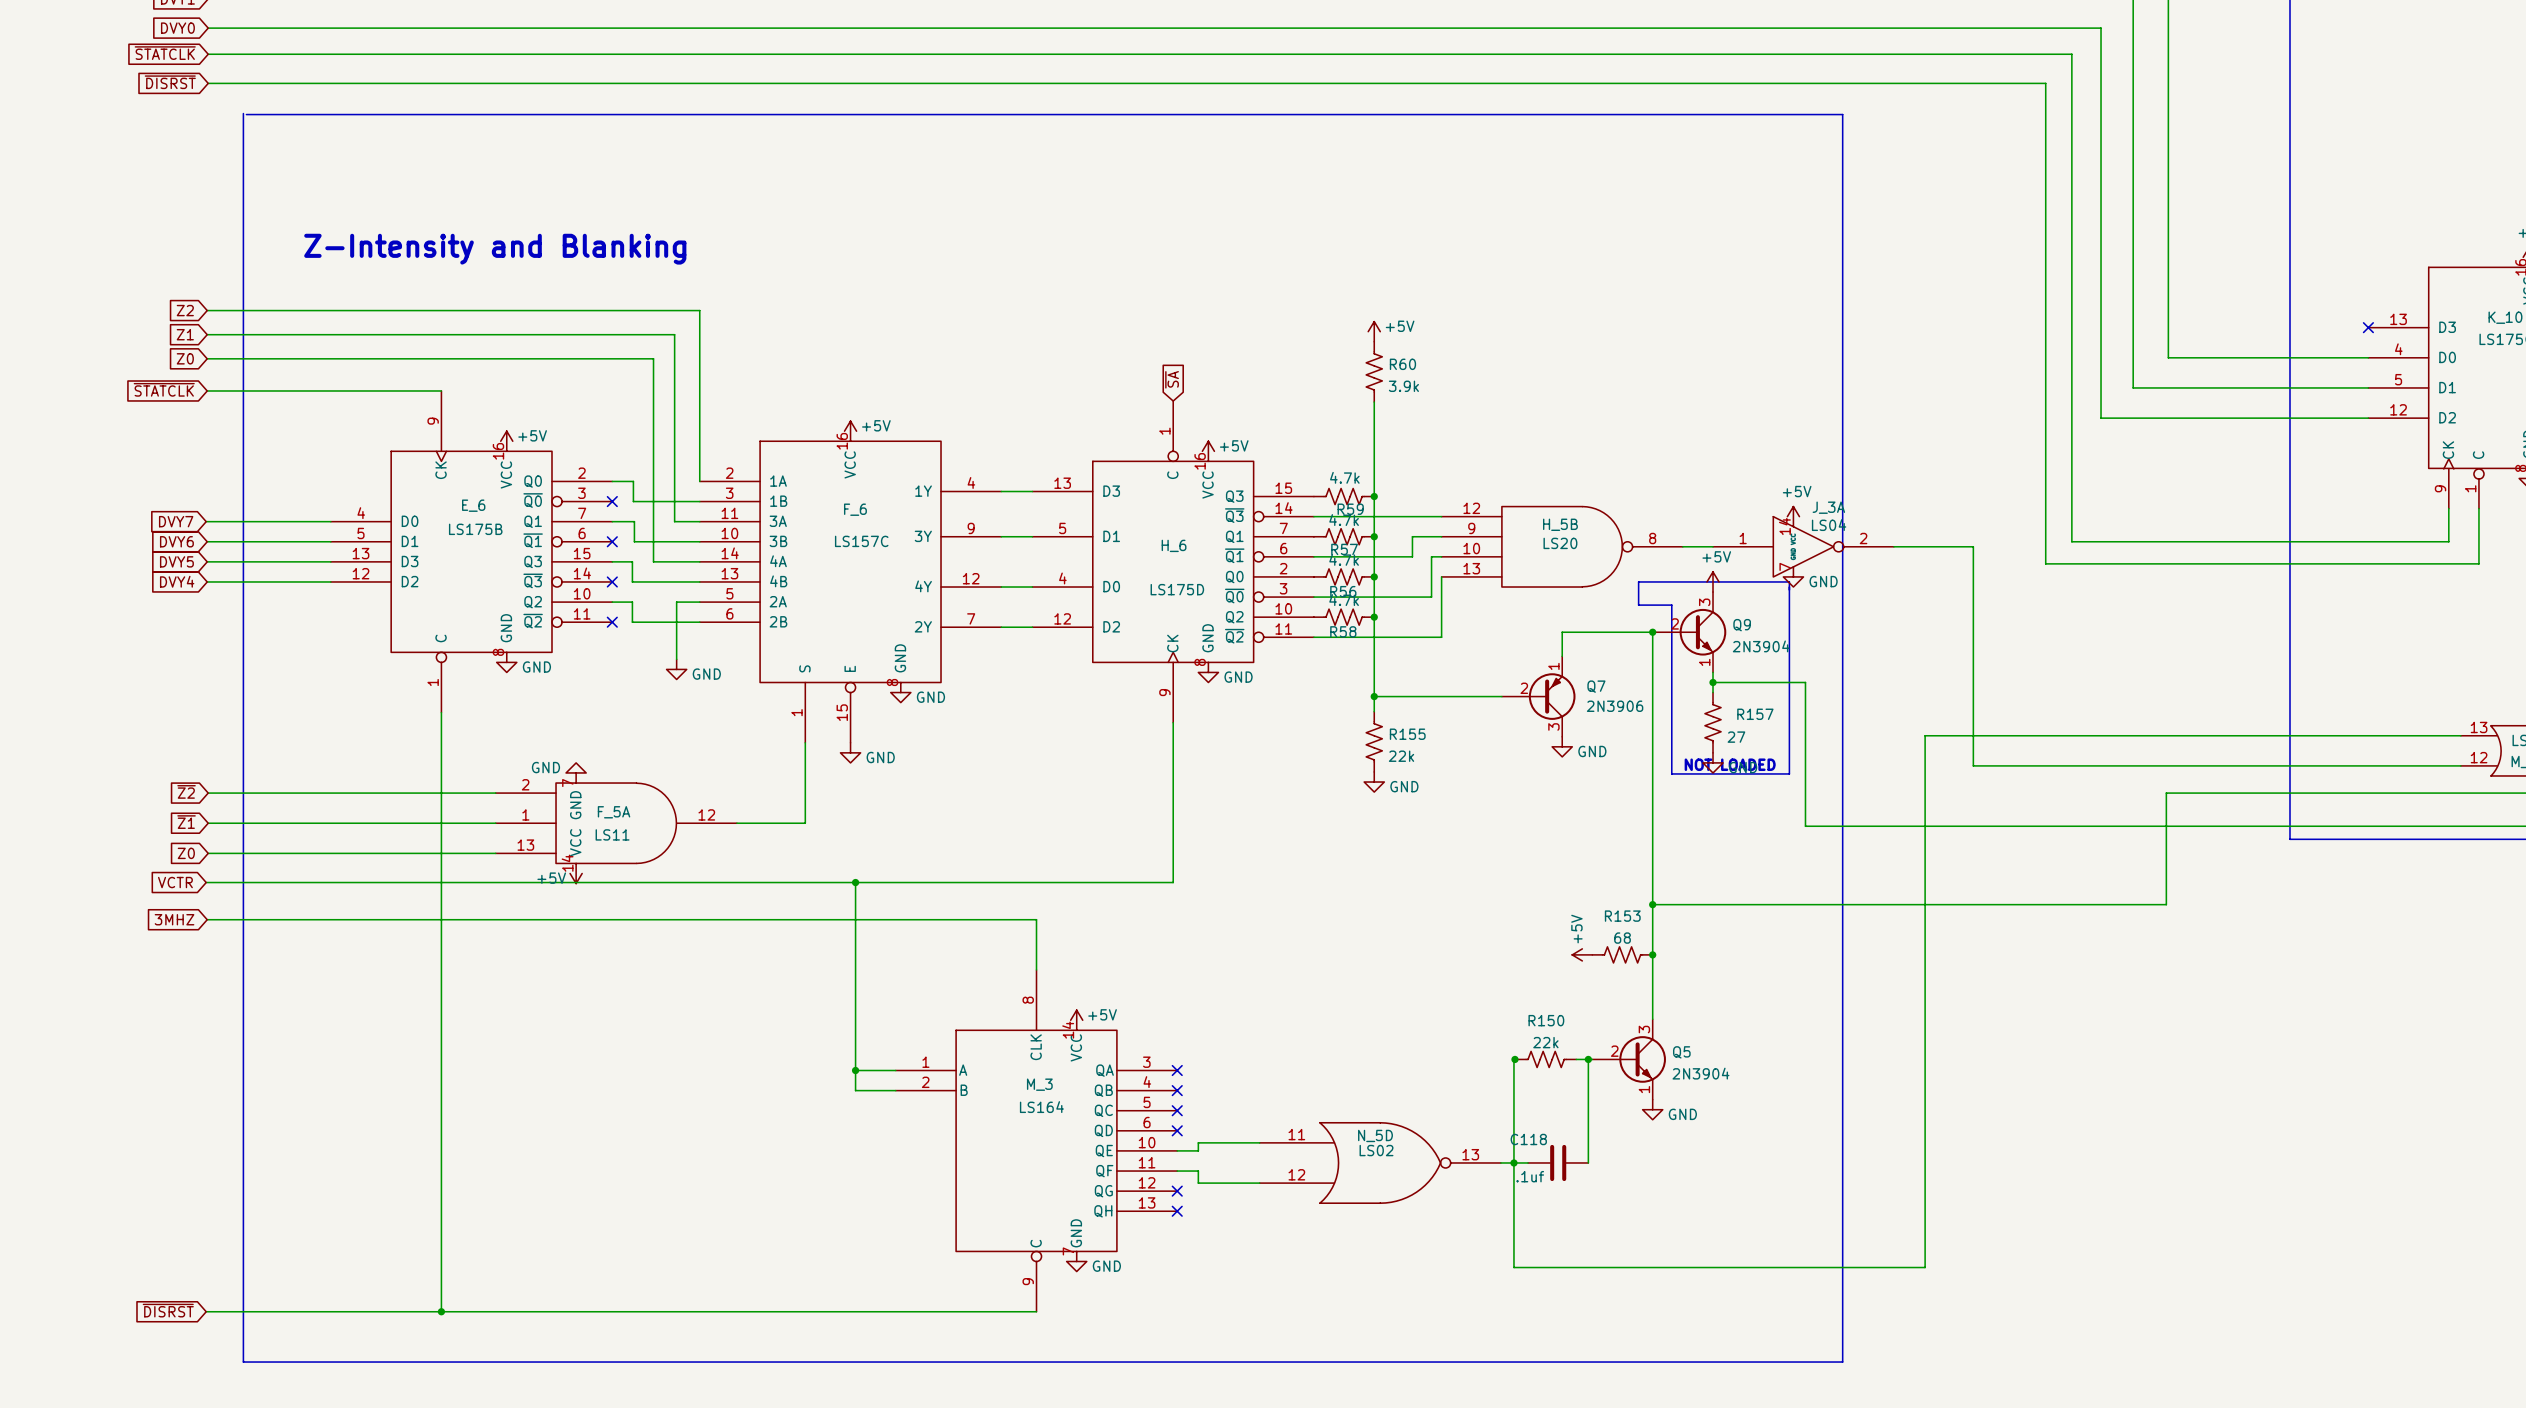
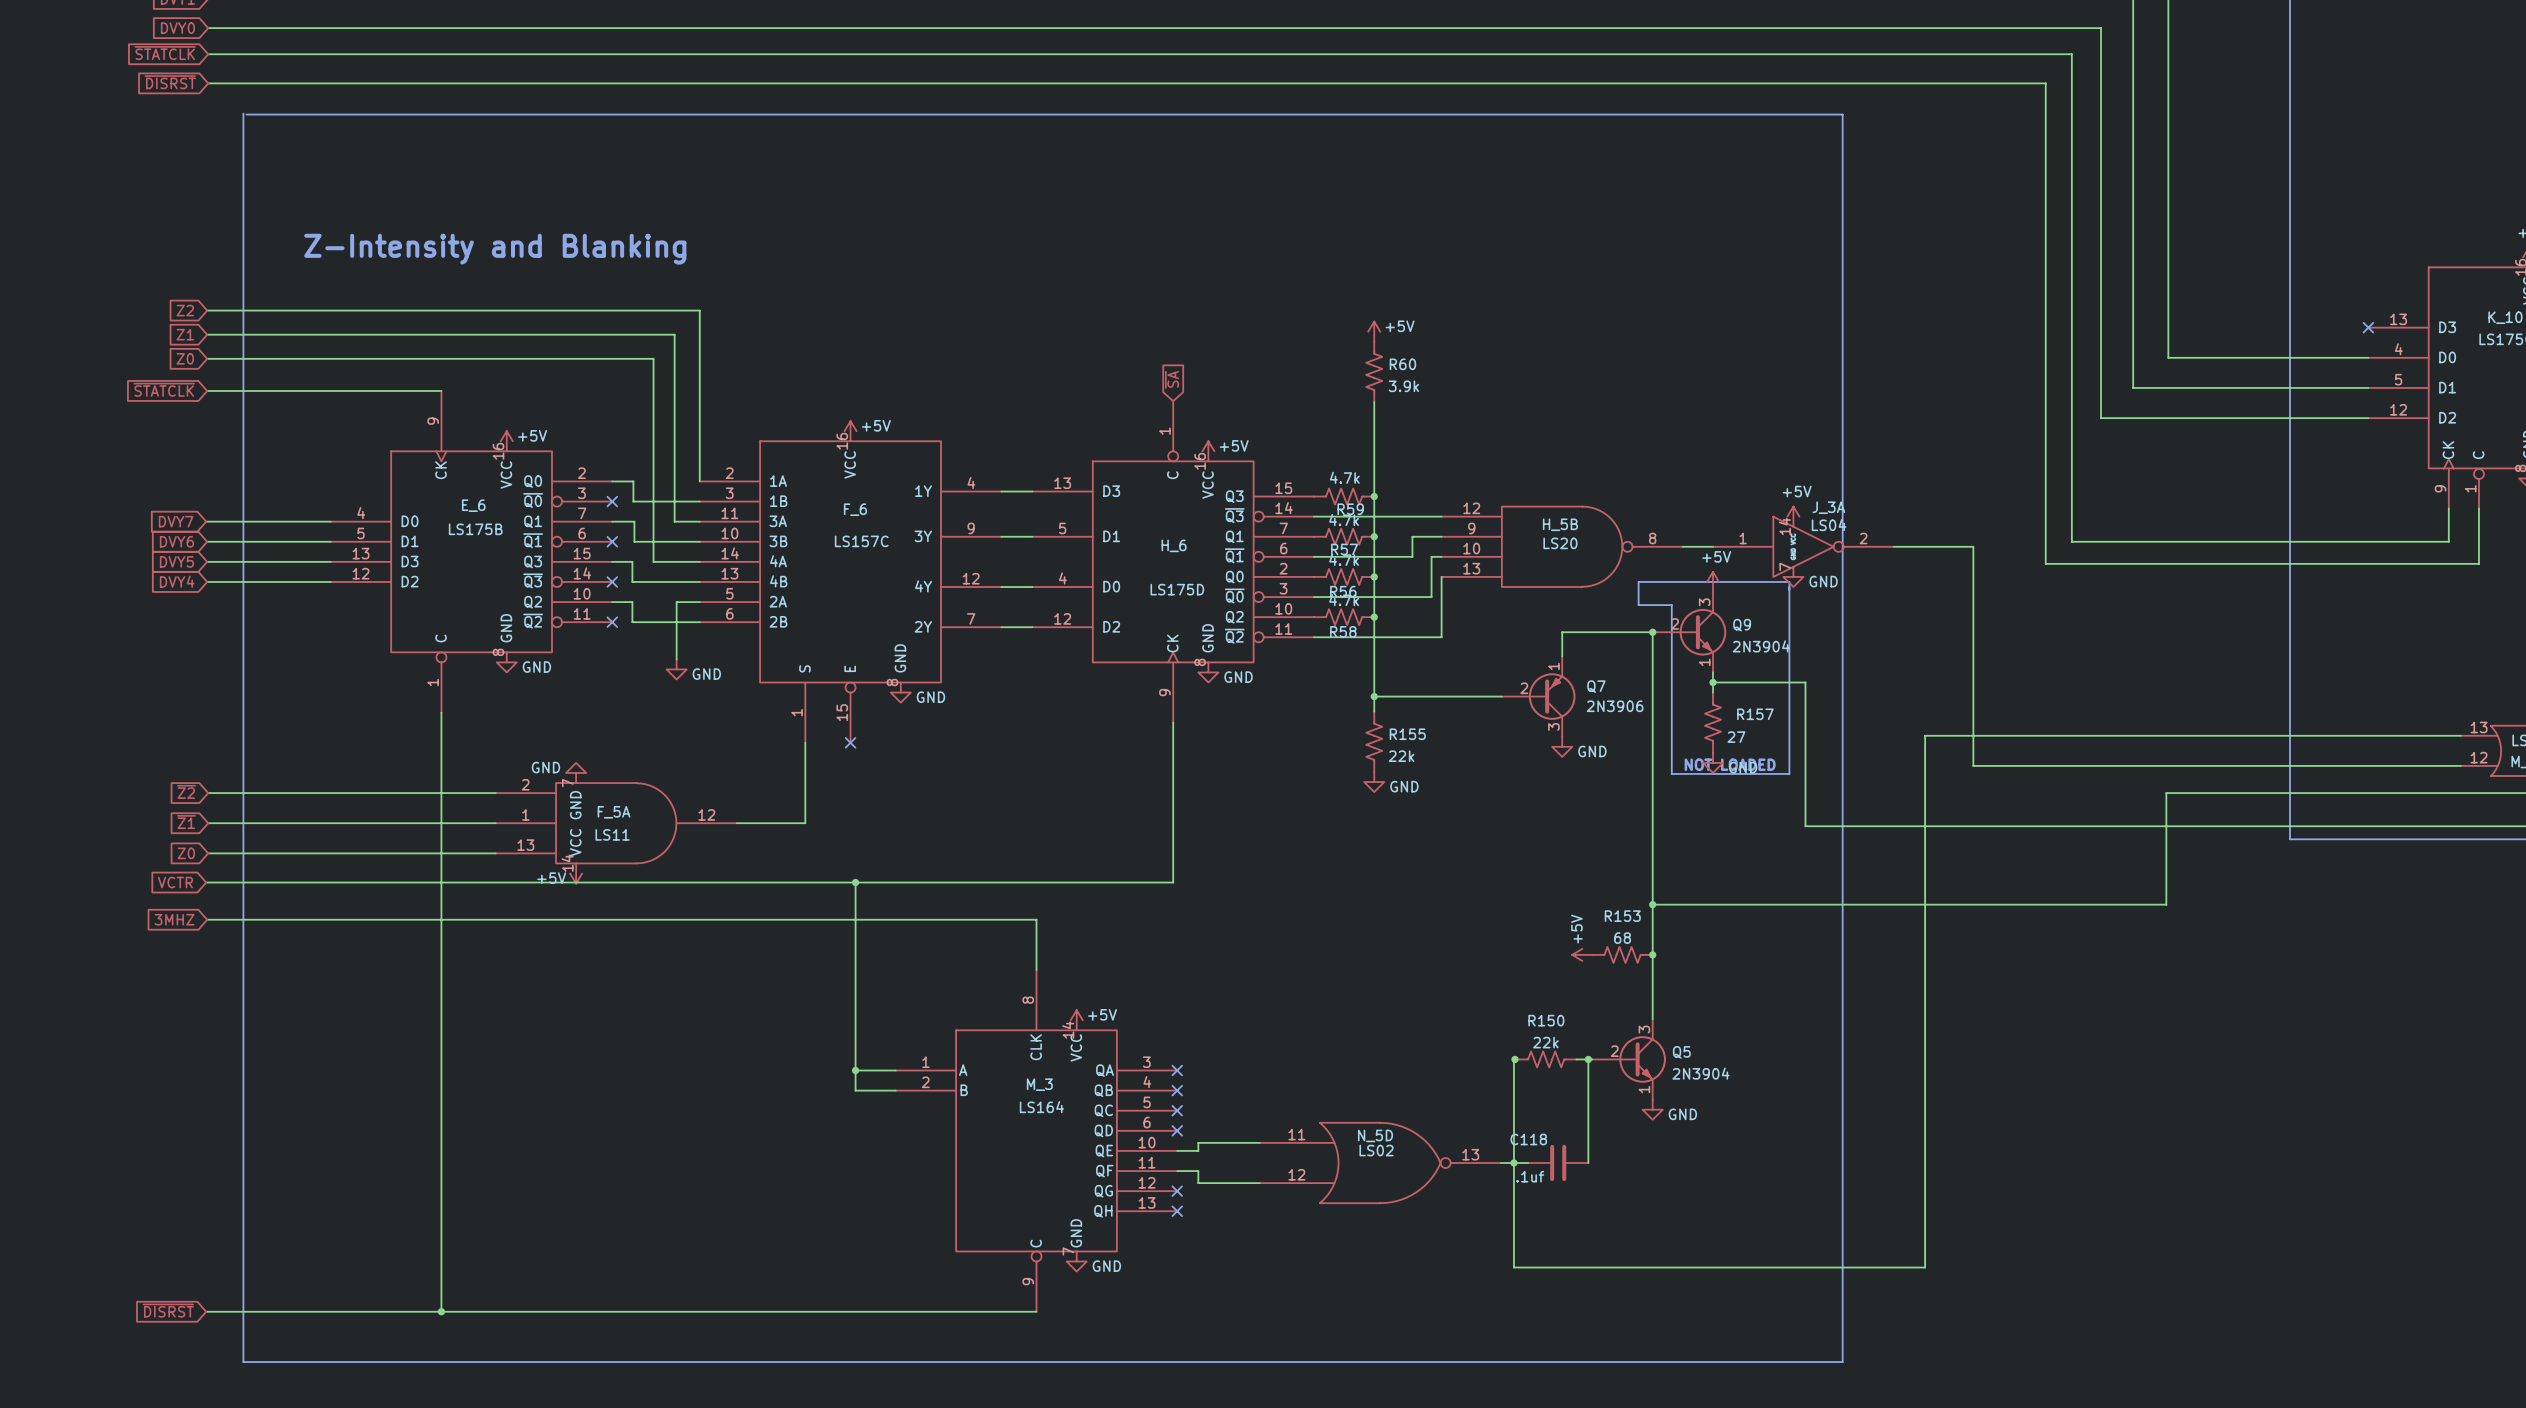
no-connect mark: none -> (850, 742)
power symbol: GND (850, 752) -> none

